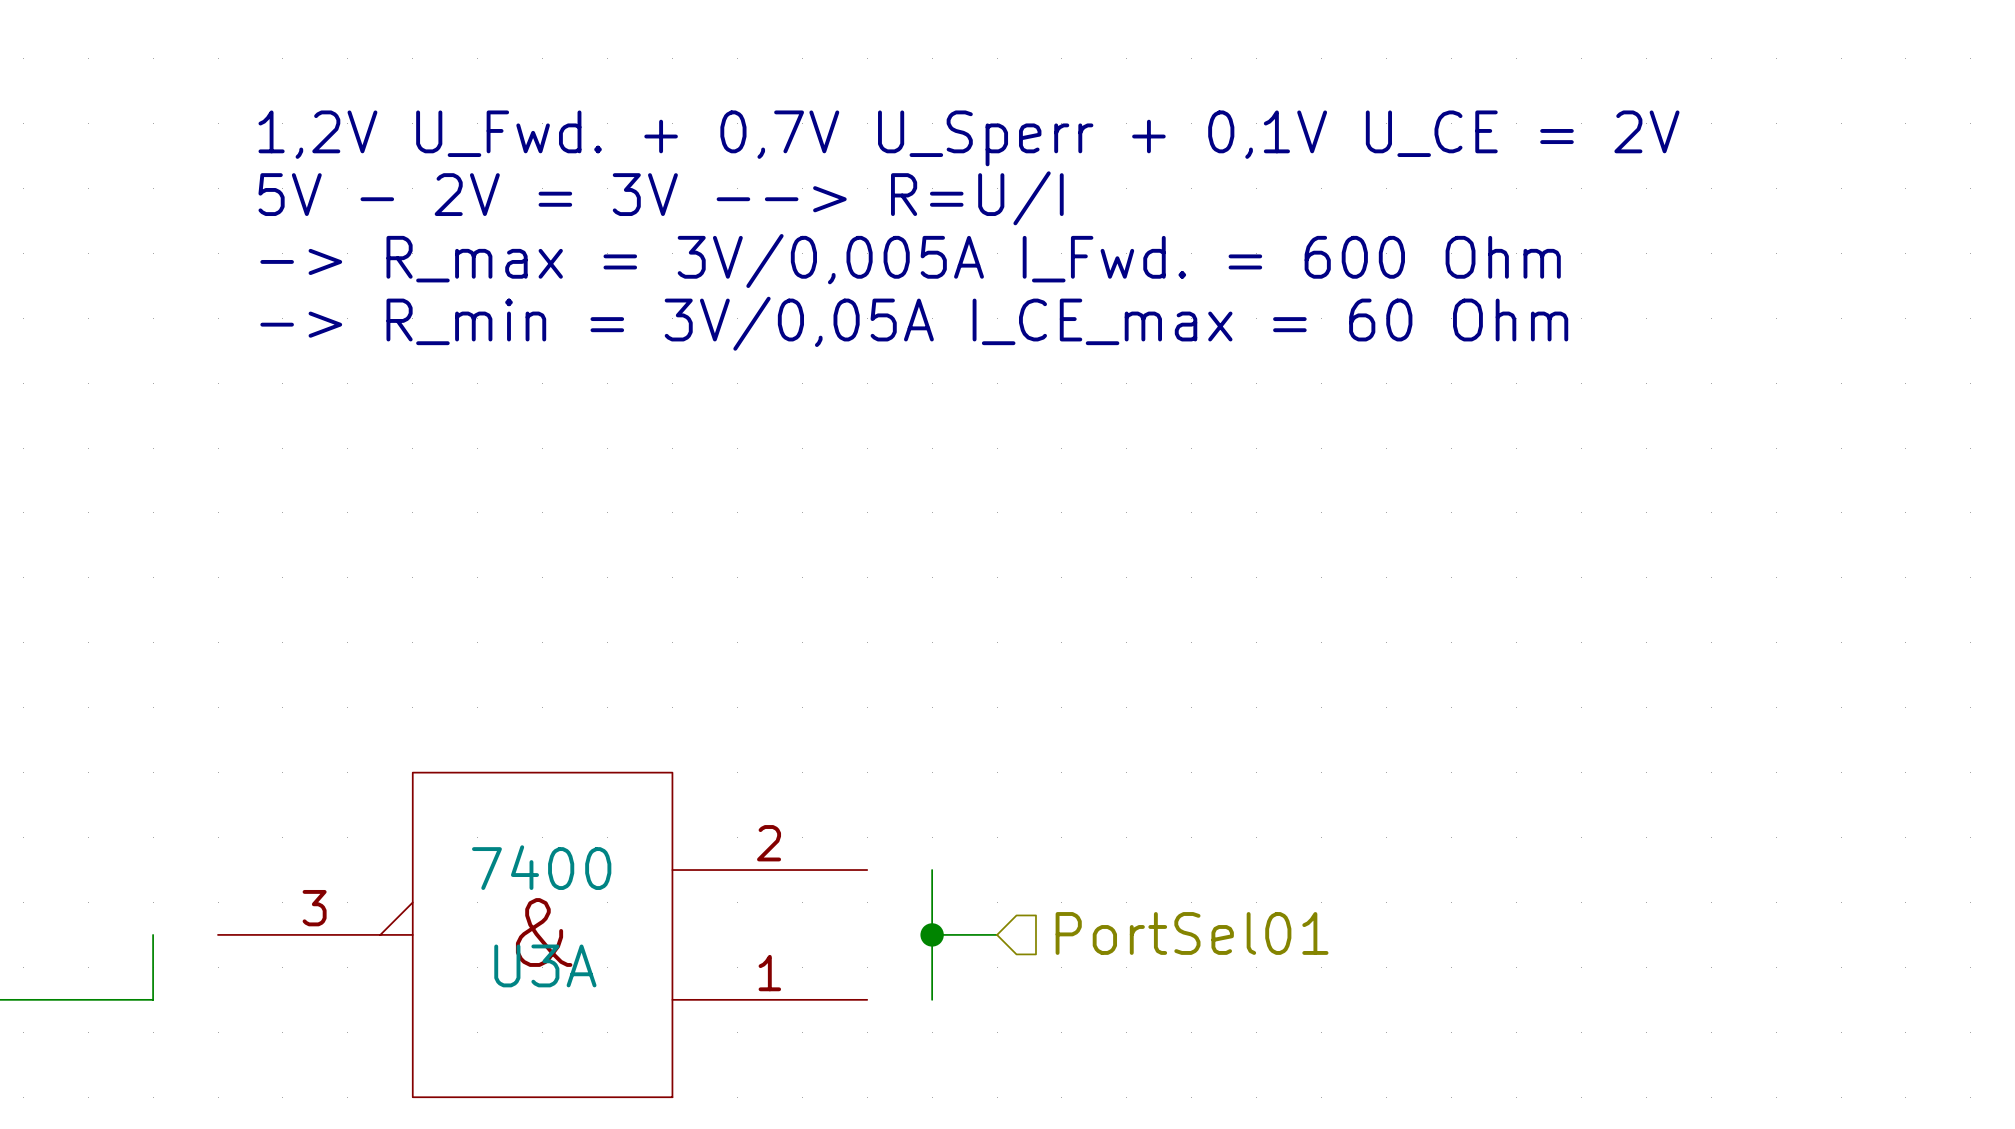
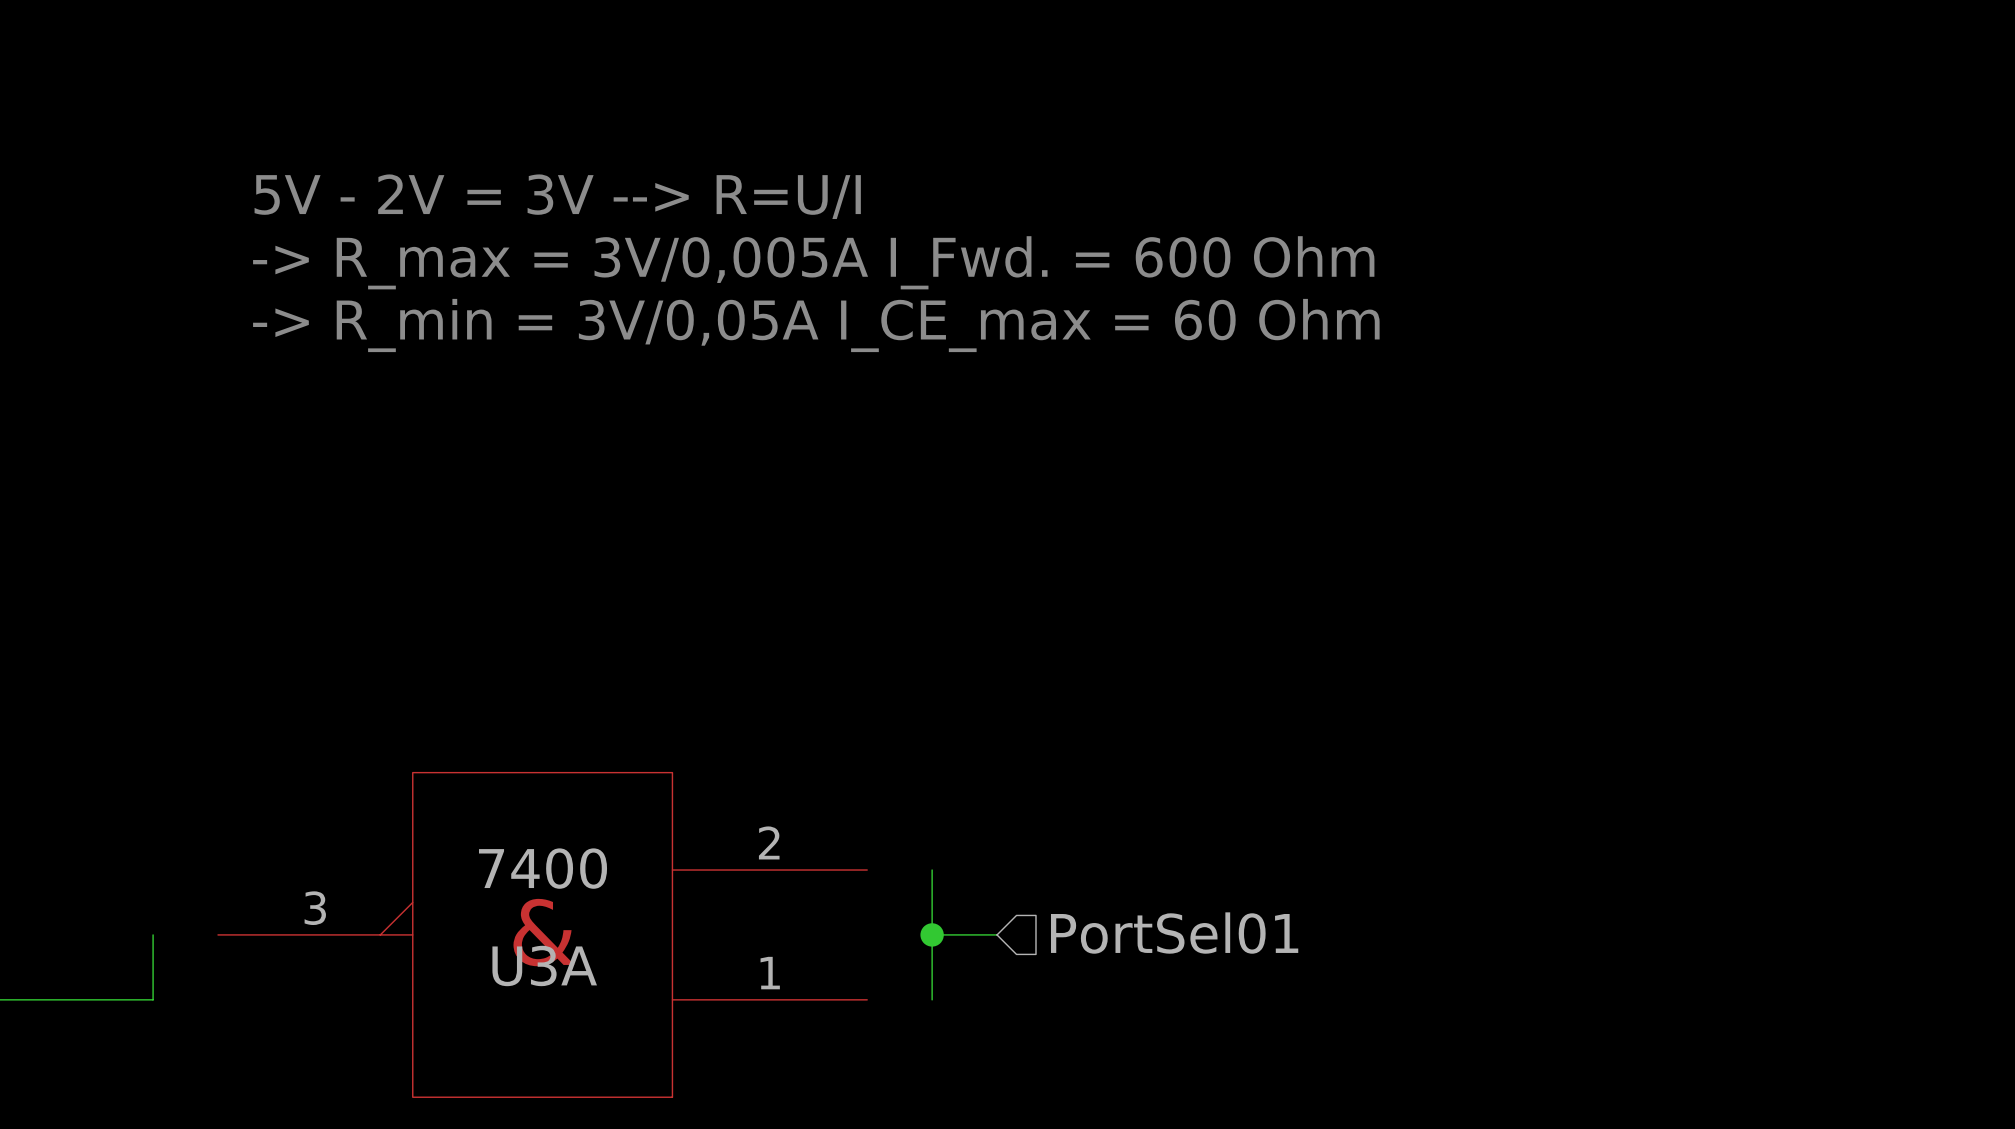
text: 1,2V U_Fwd. + 0,7V U_Sperr + 0,1V U_CE = 2V (969, 138) -> none

